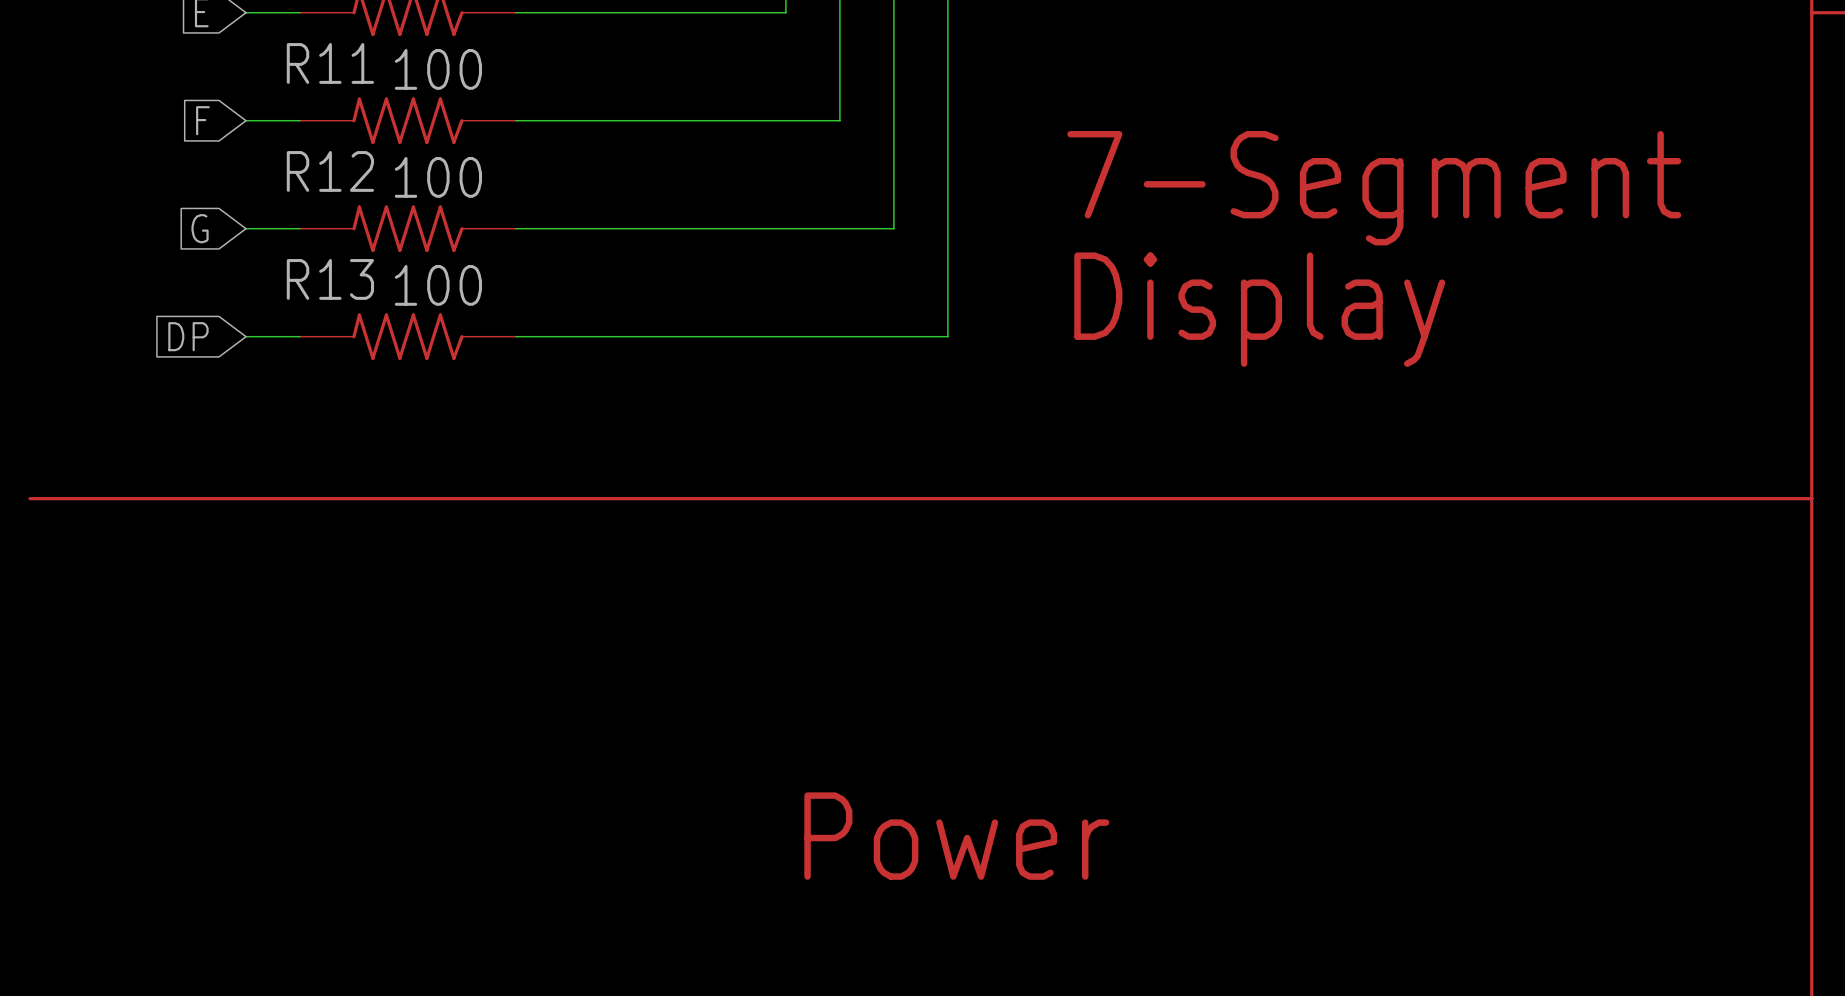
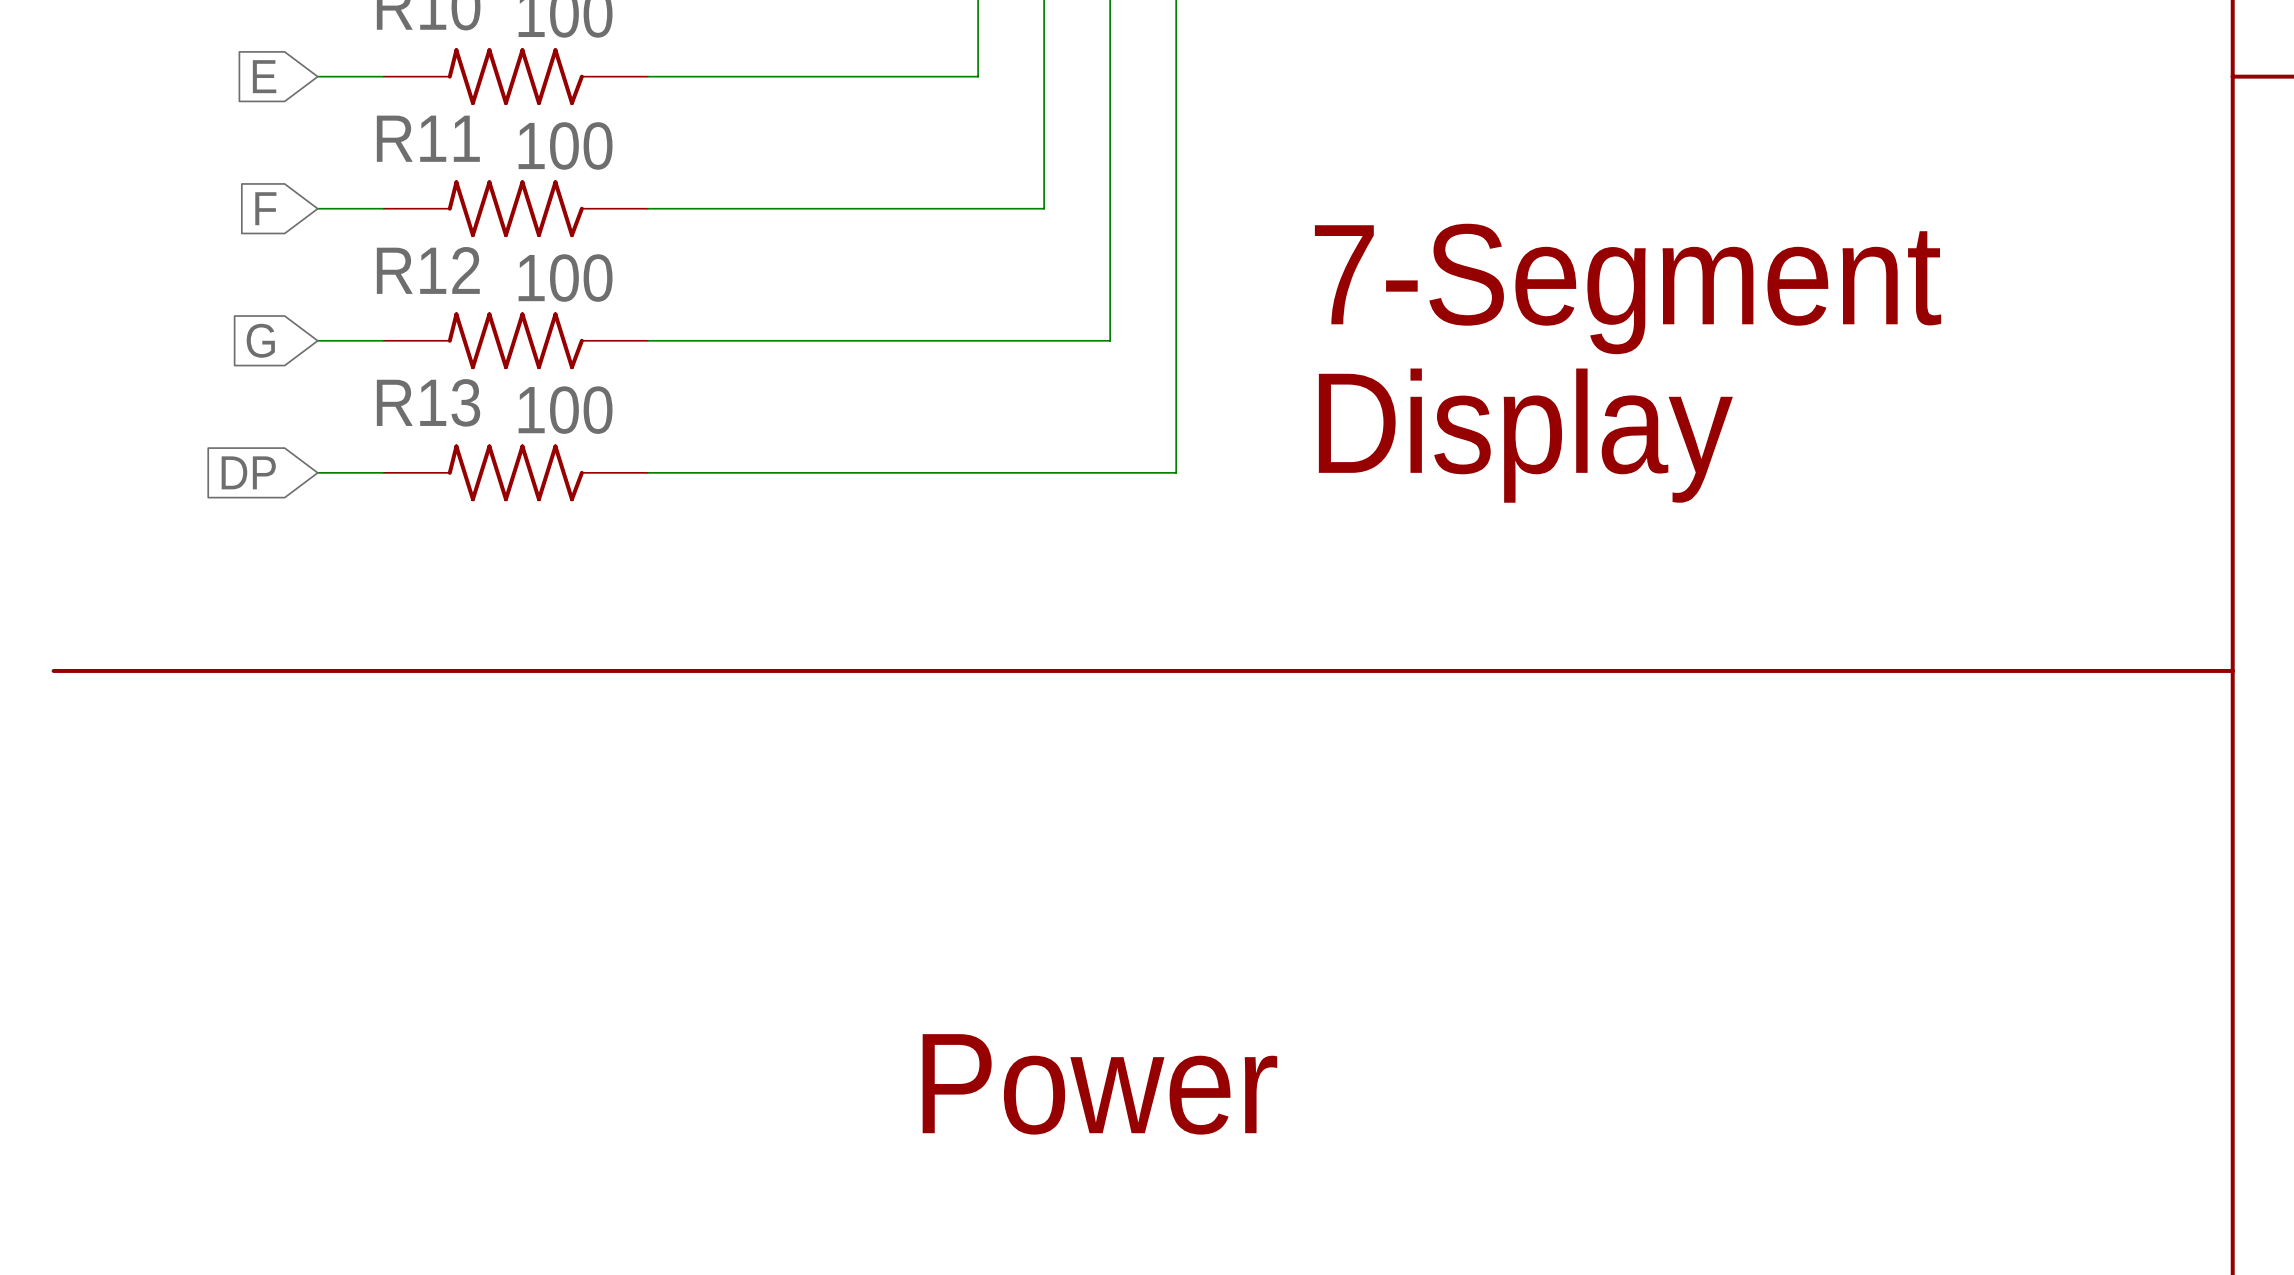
text position: Power (956, 836) -> Power (1099, 1084)

